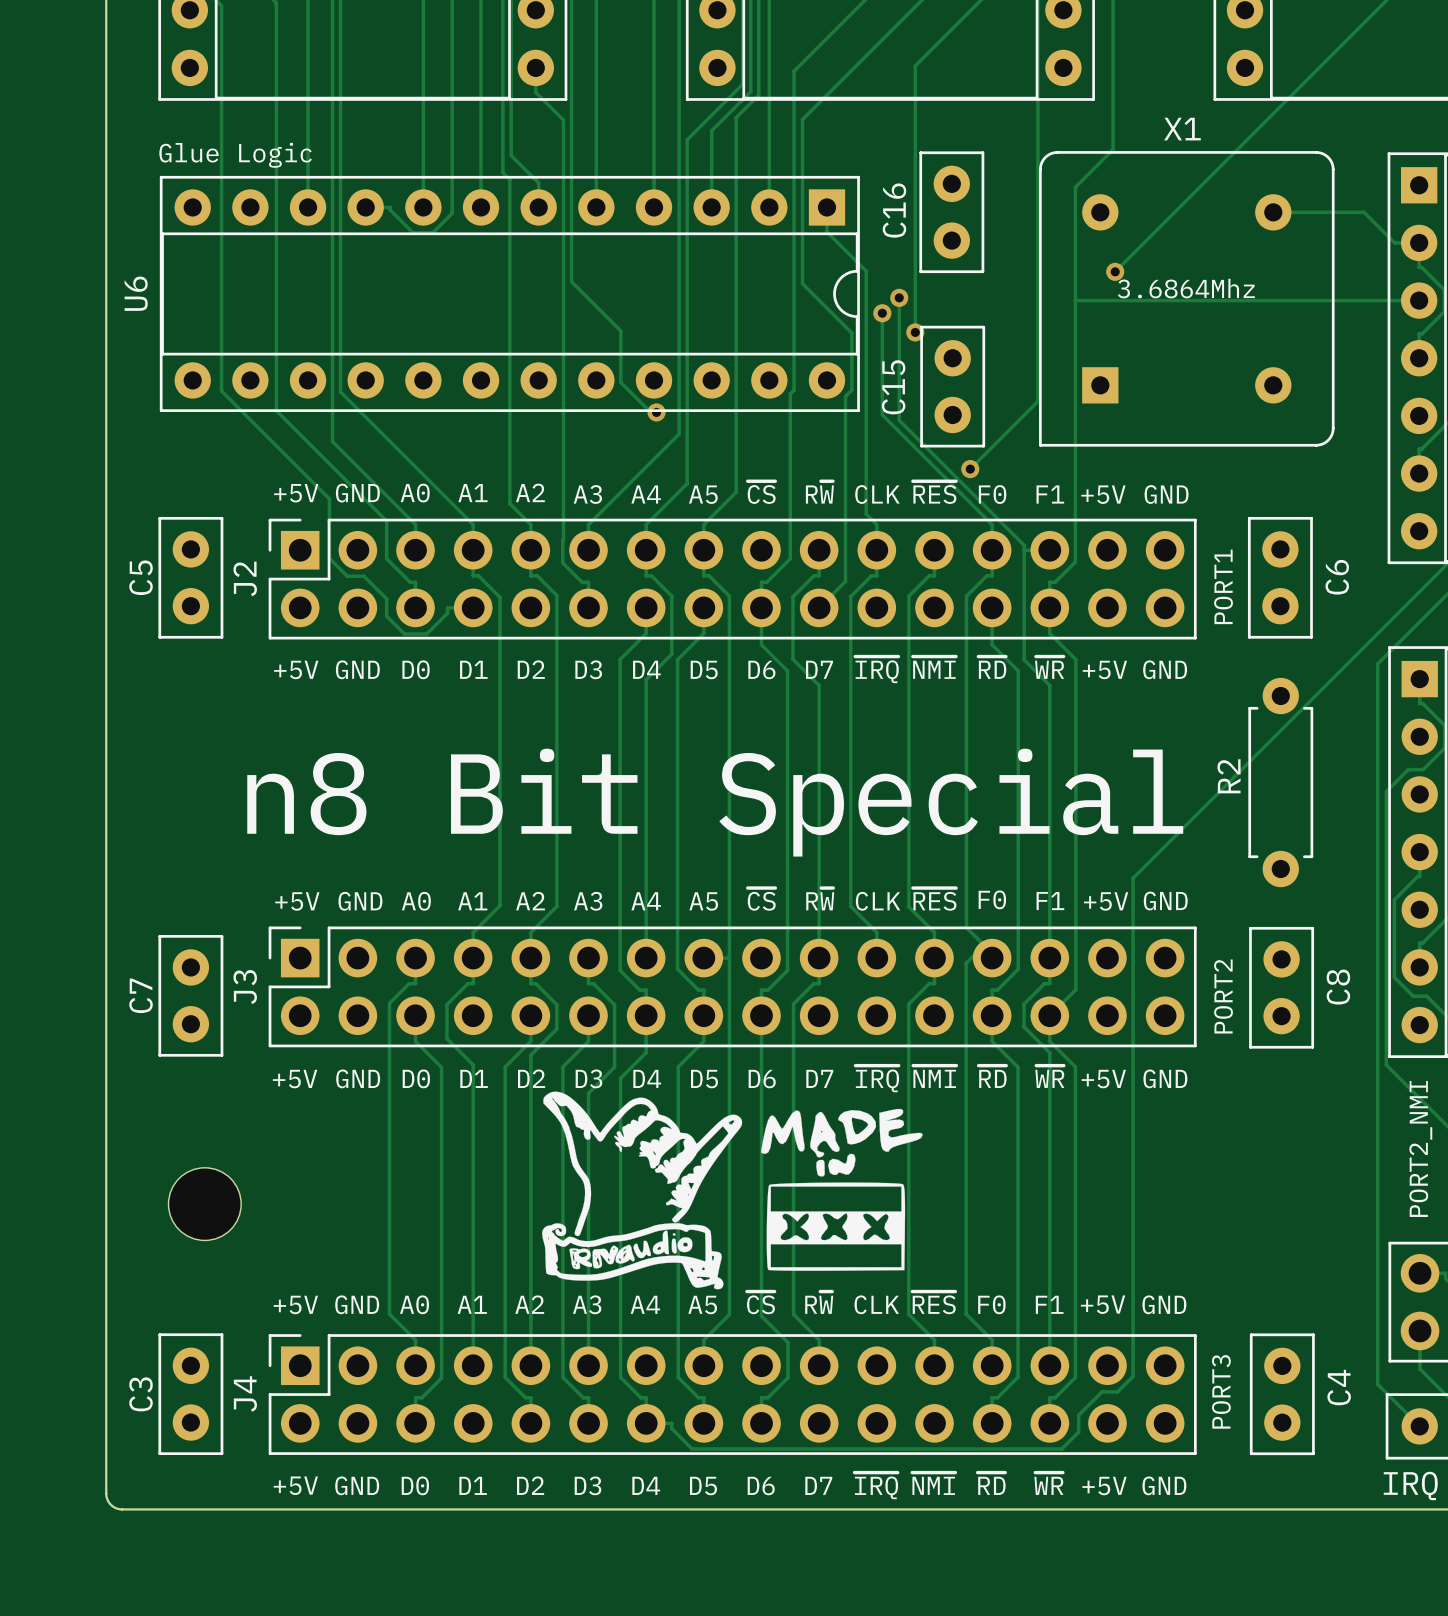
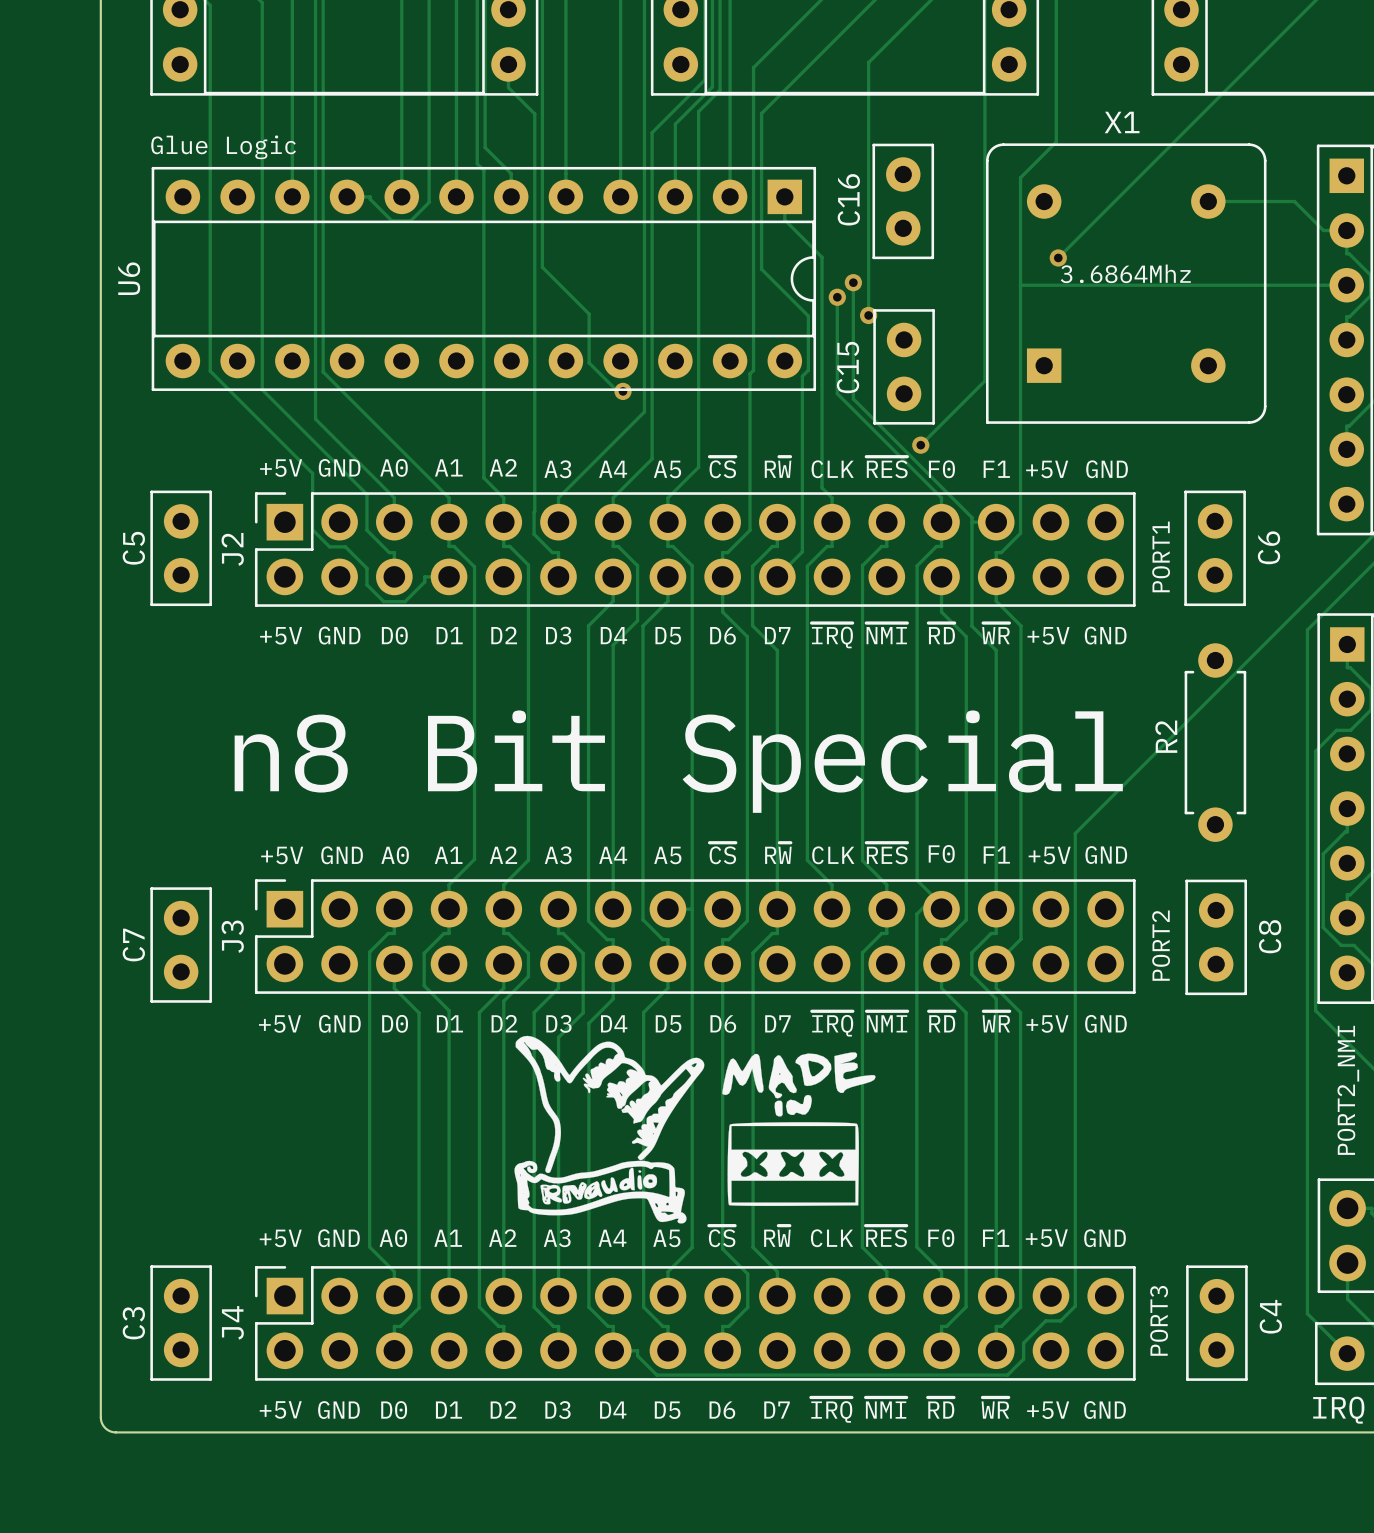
part: (204, 1204) -> none

